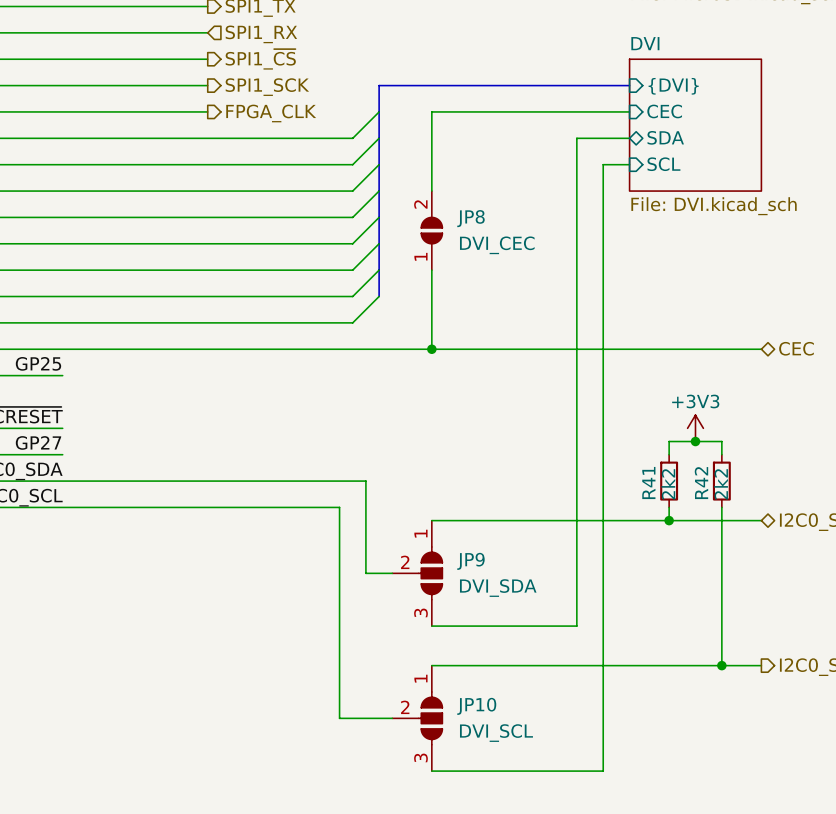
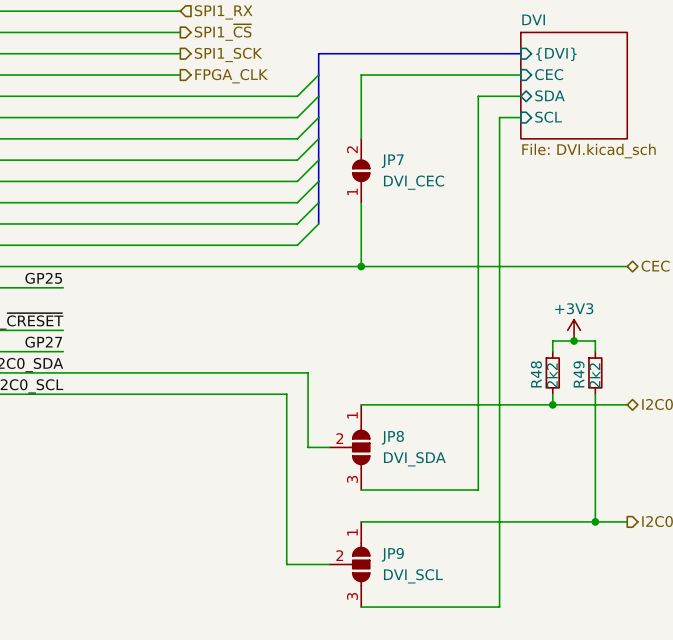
JP8 name: JP8 (470, 218) -> JP7 (392, 161)
R41 name: R41 (648, 483) -> R48 (536, 374)
R42 name: R42 (701, 483) -> R49 (578, 374)
JP9 symbol: [392, 520, 443, 627] -> [329, 521, 370, 608]
JP8: none -> DVI_SDA (349, 447)
JP10: DVI_SCL (417, 718) -> none

